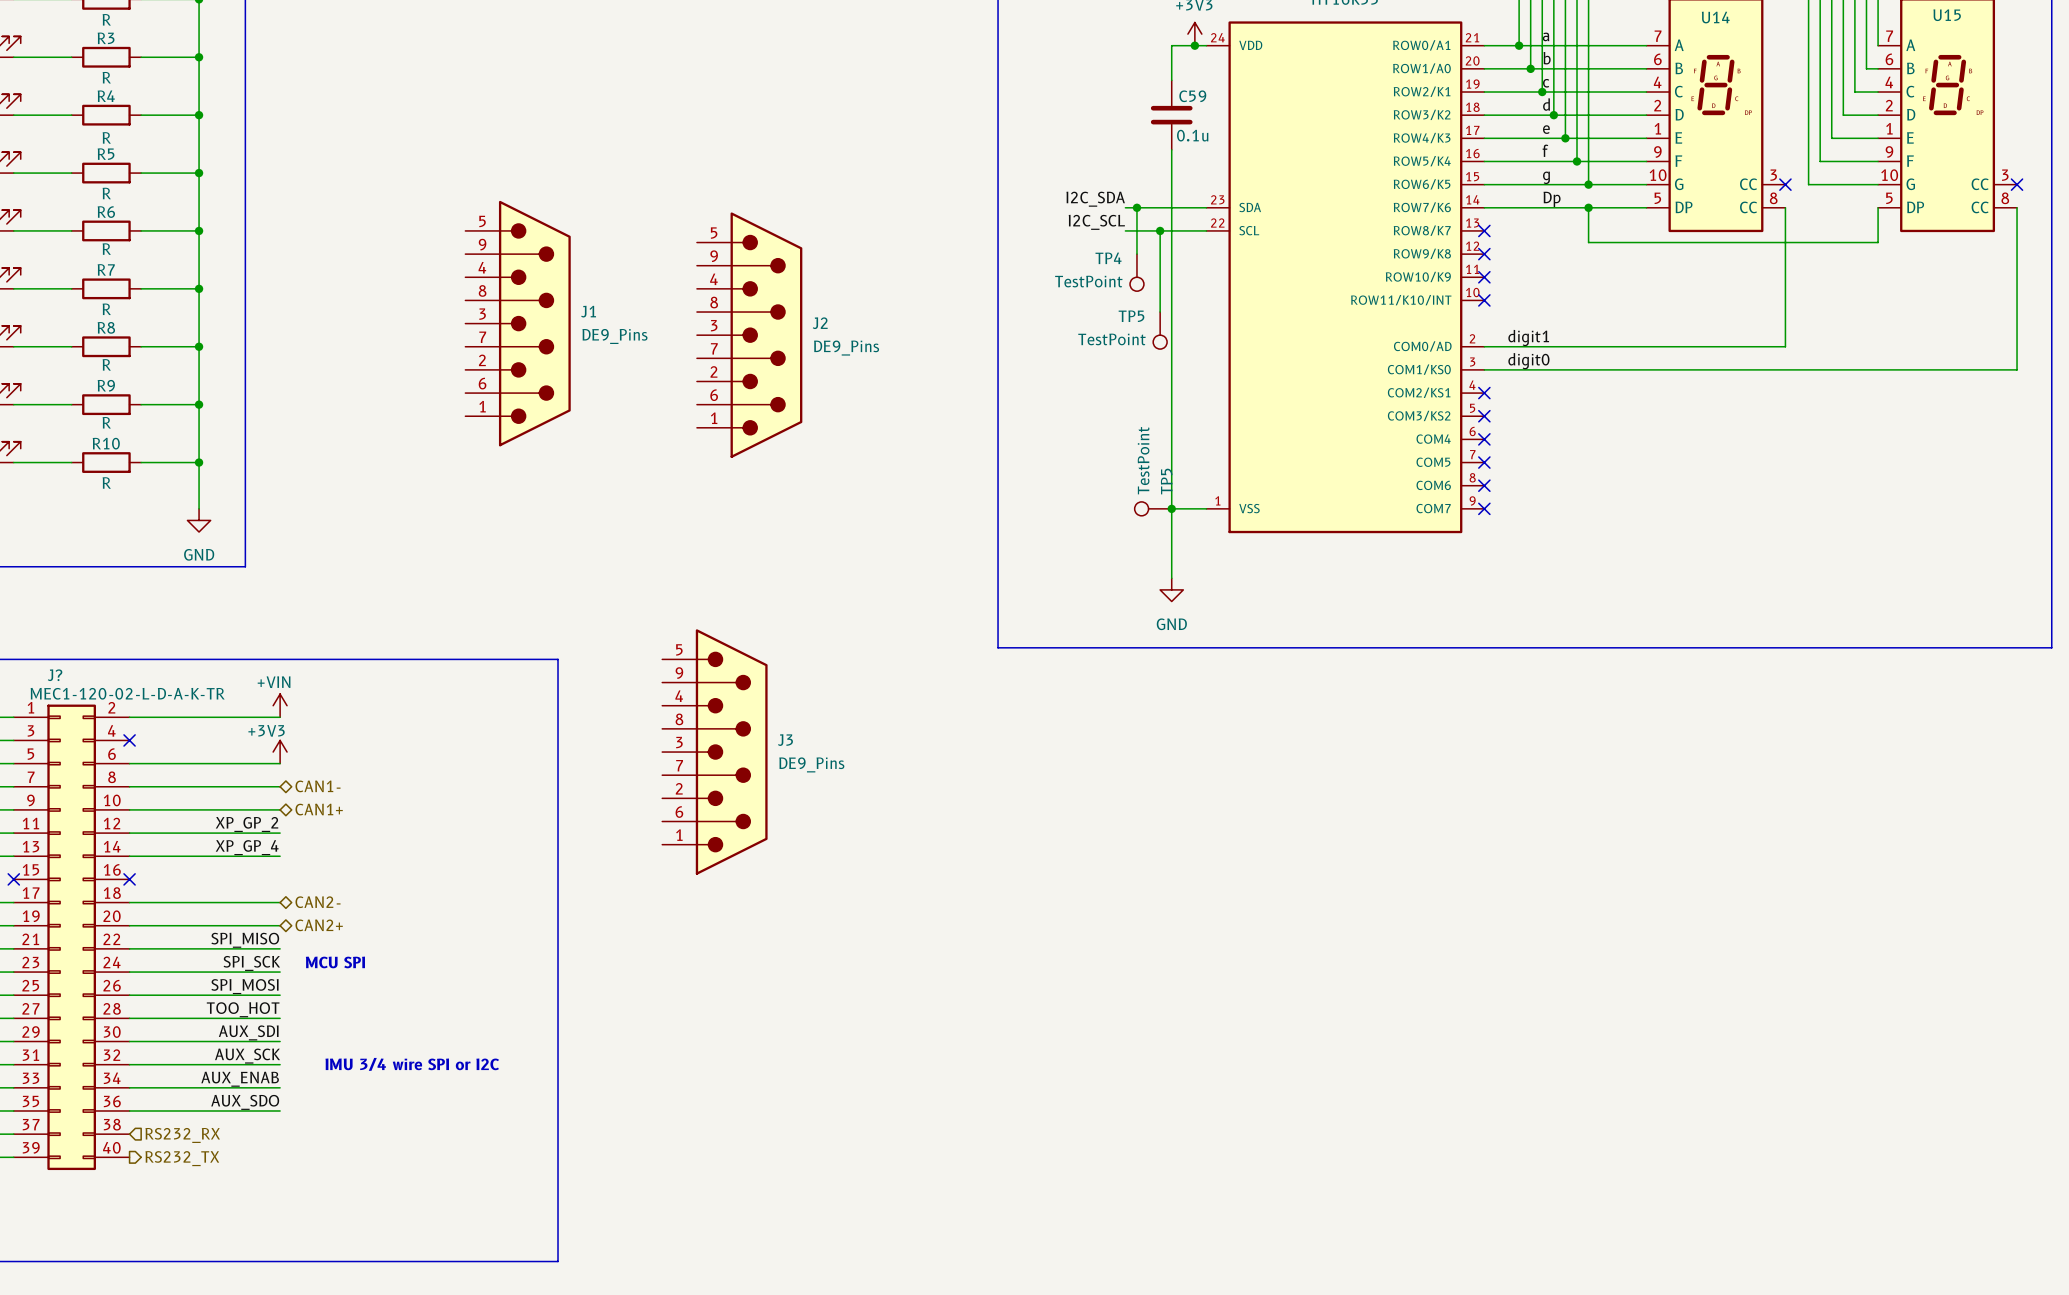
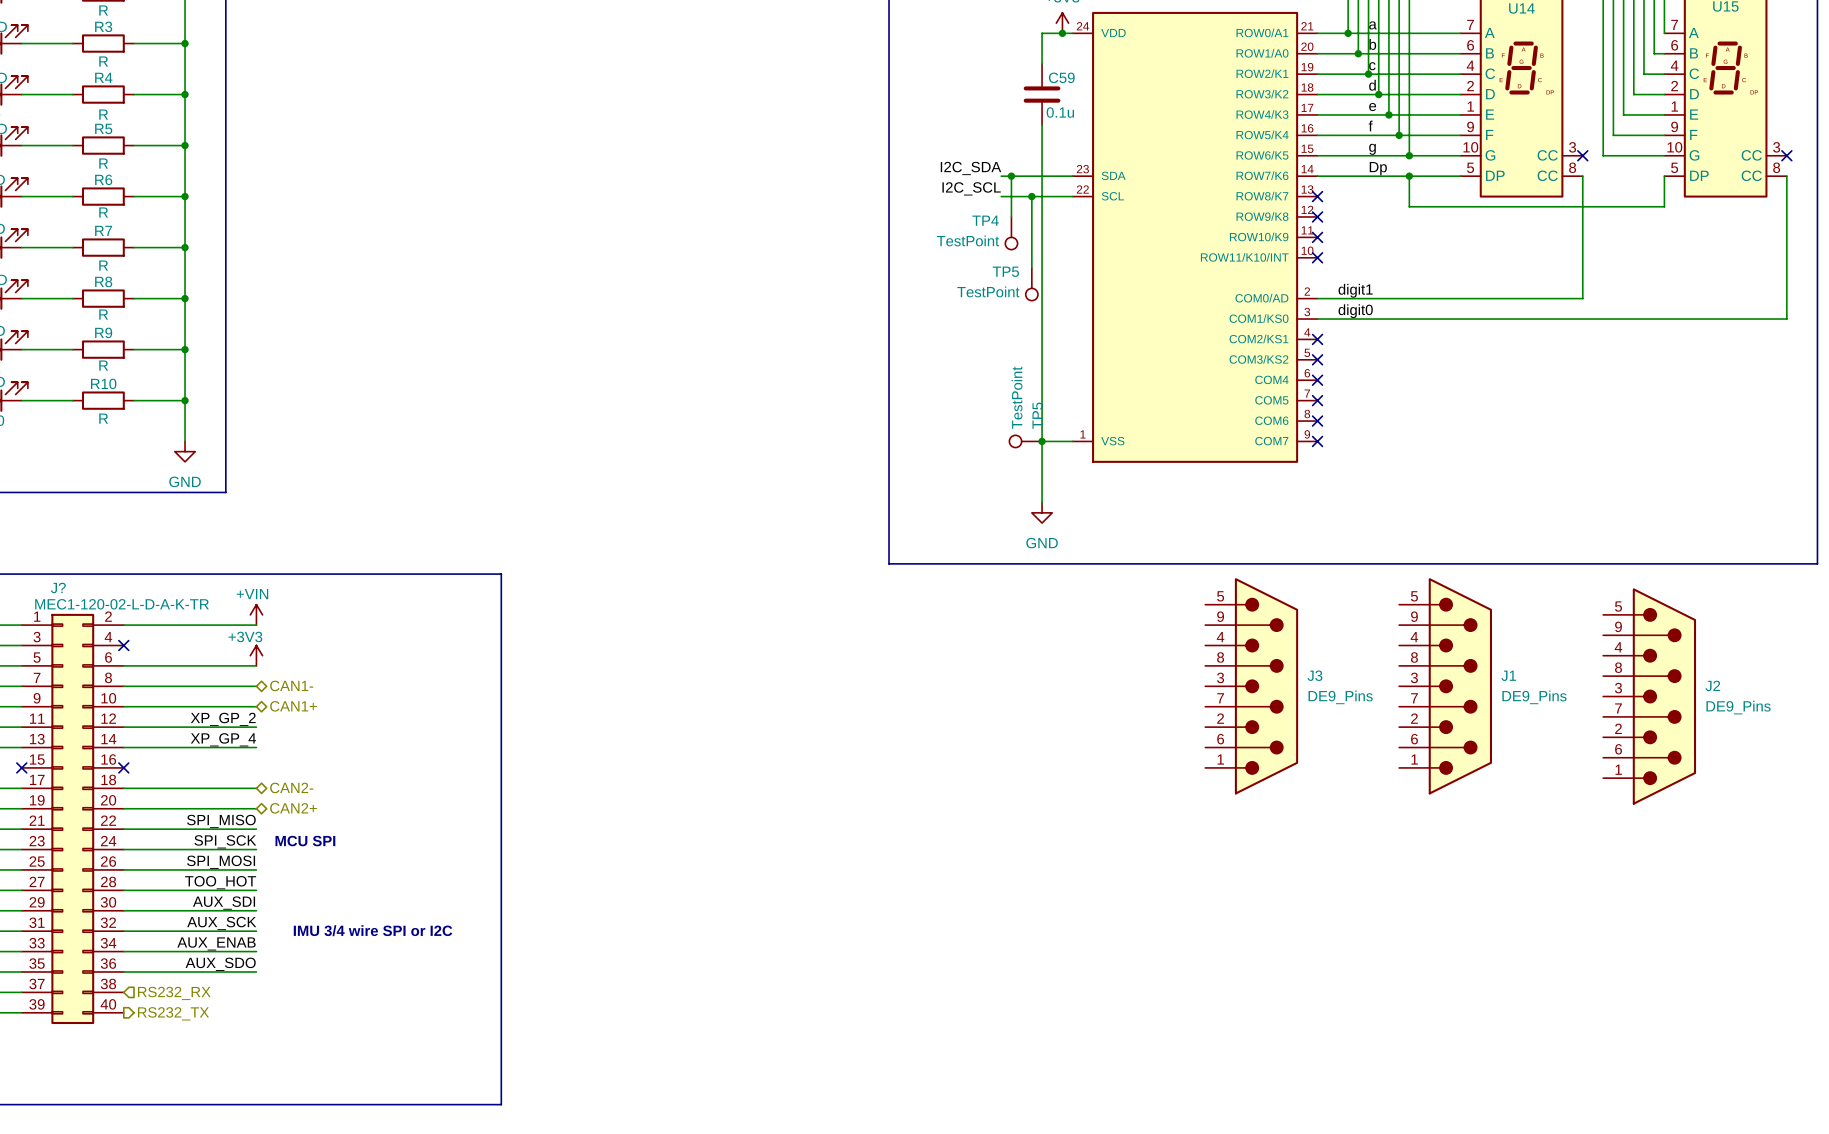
J1 position: (518, 323) -> (1445, 686)
J2 position: (749, 335) -> (1649, 696)
J3 position: (714, 752) -> (1251, 686)

